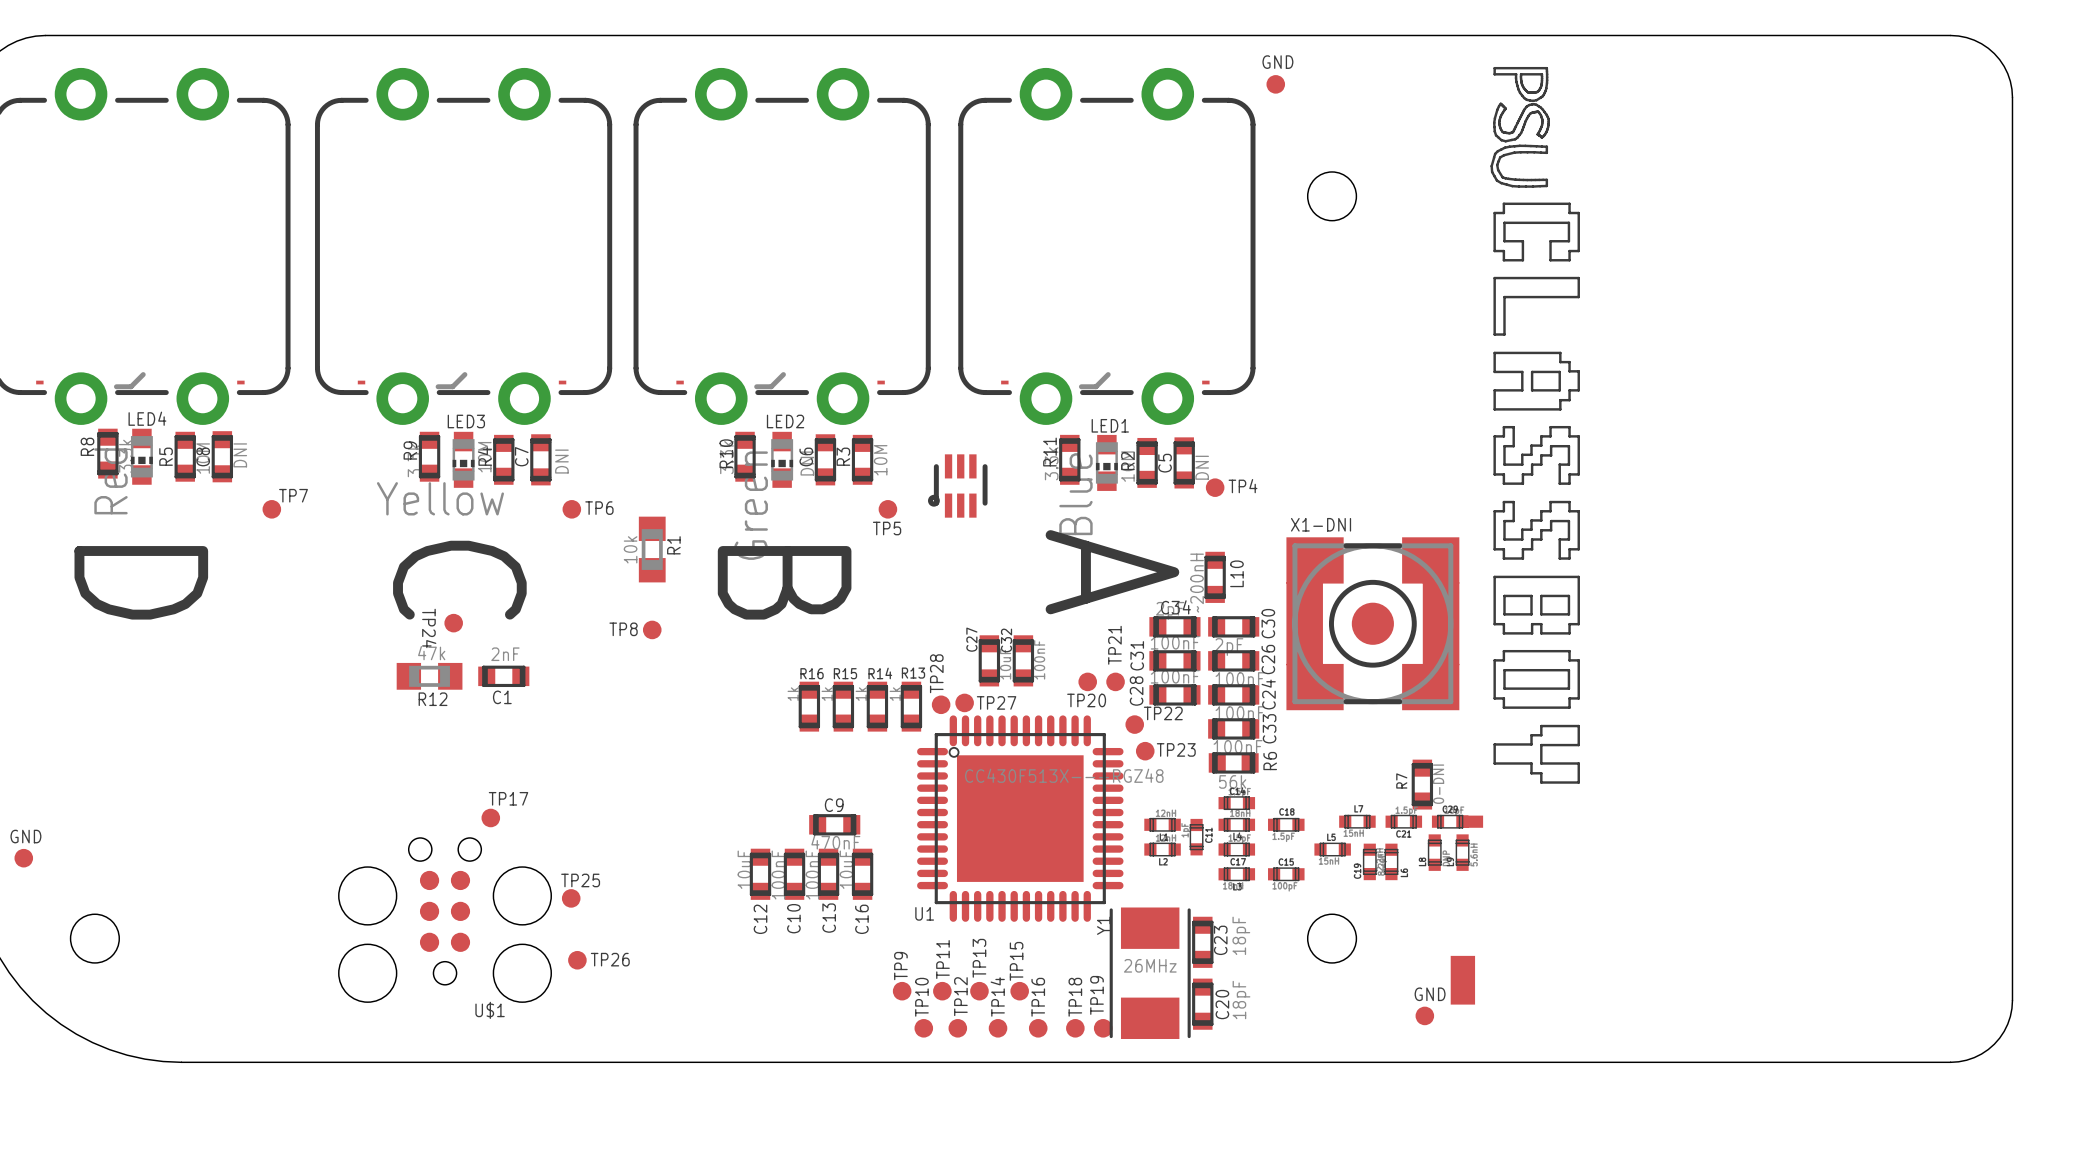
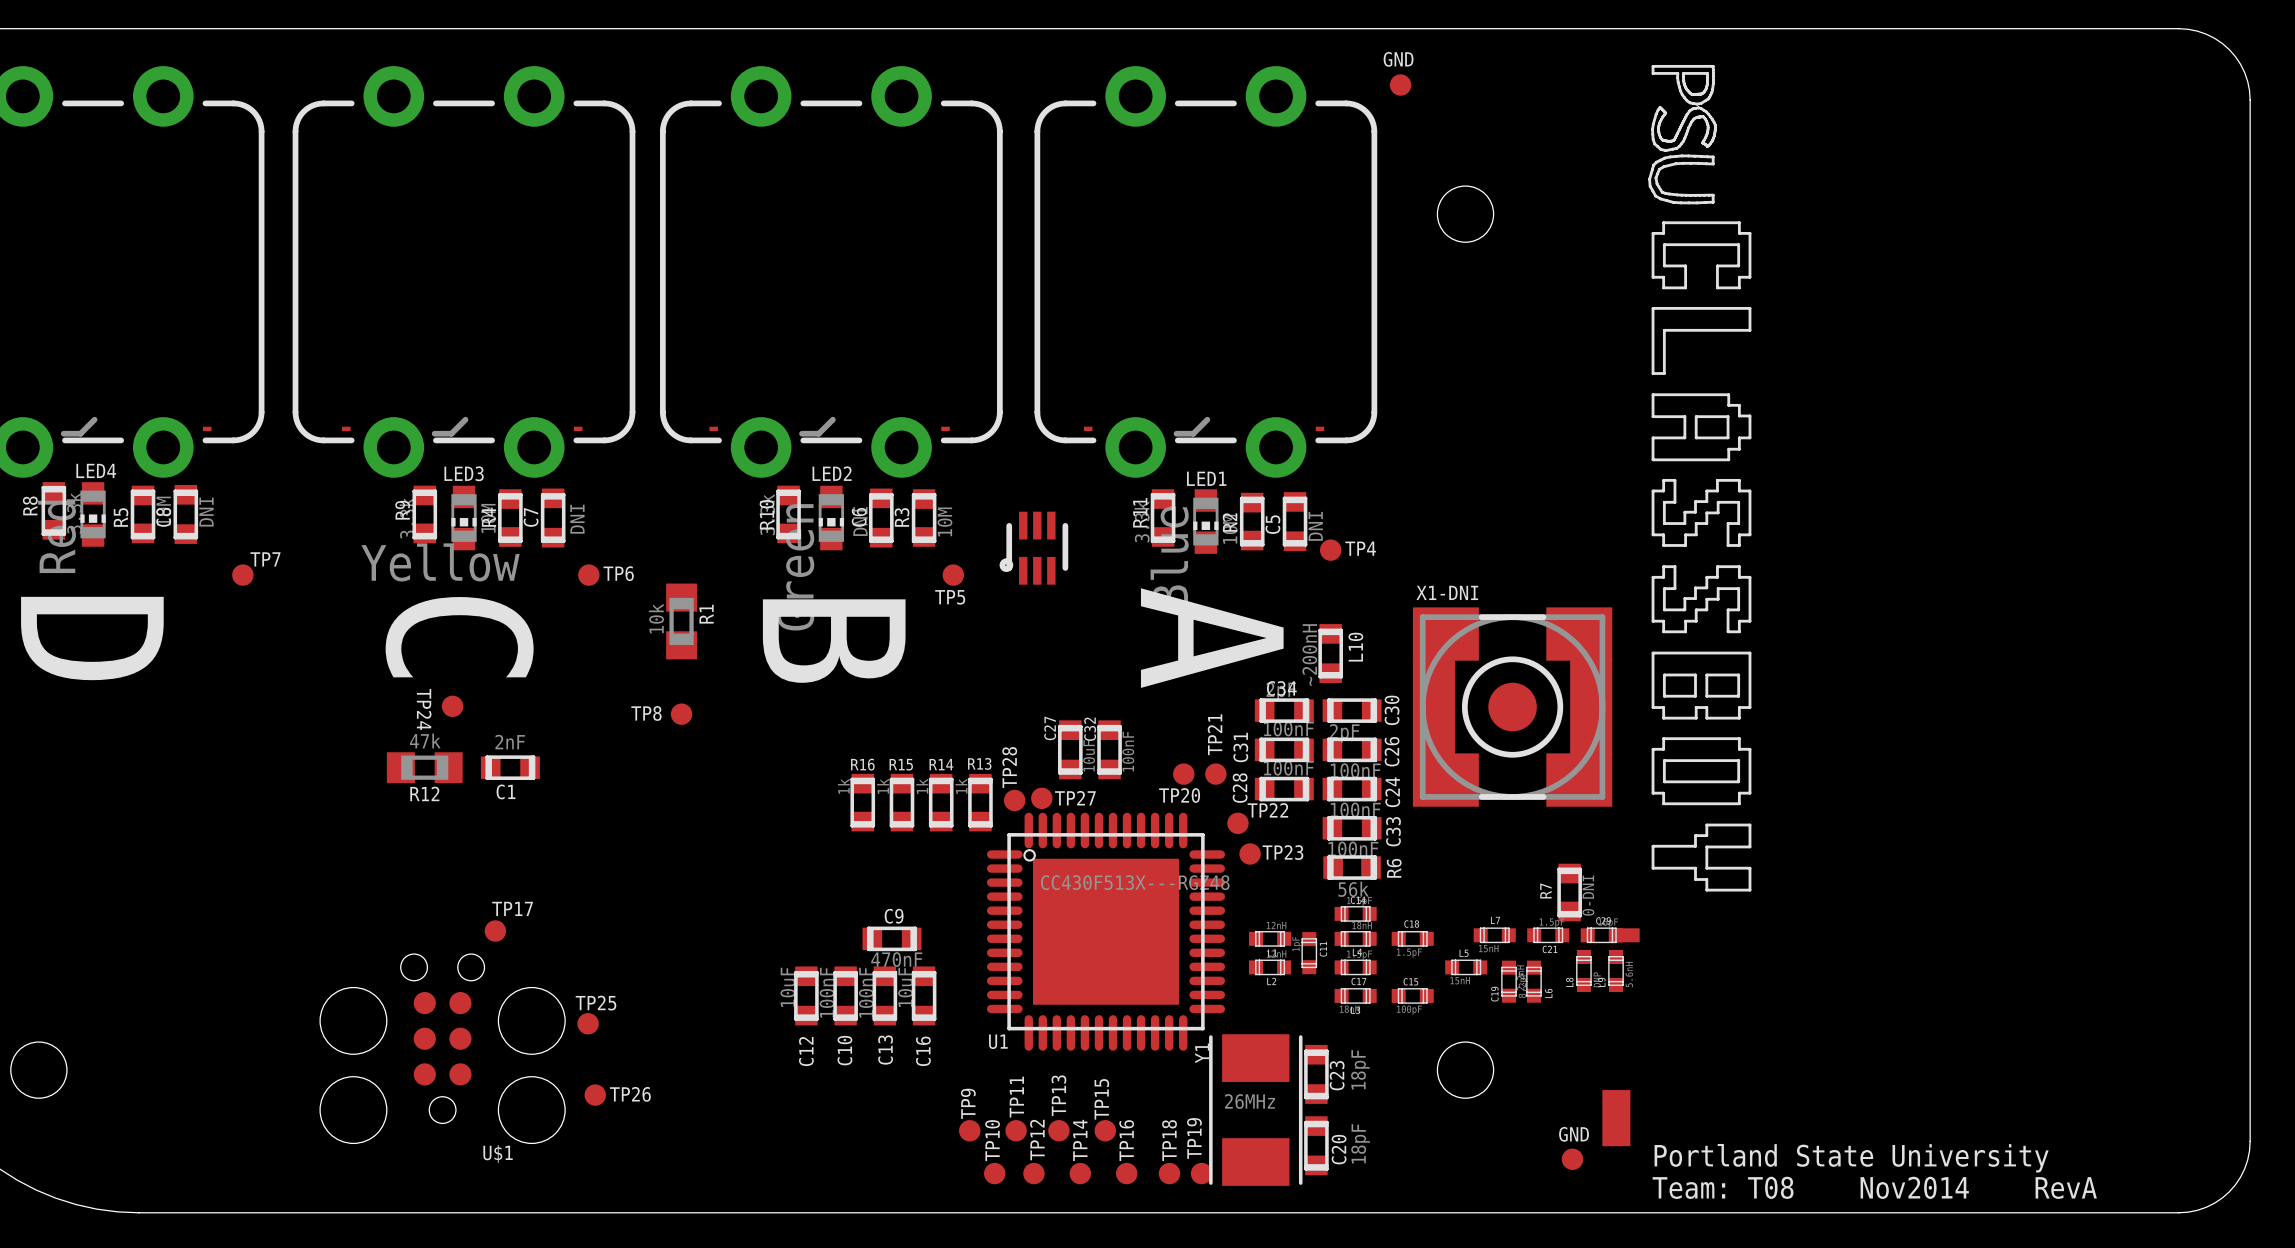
text: none -> Portland State University (1851, 1158)
text: none -> Team: T08 Nov2014 RevA (1874, 1187)

